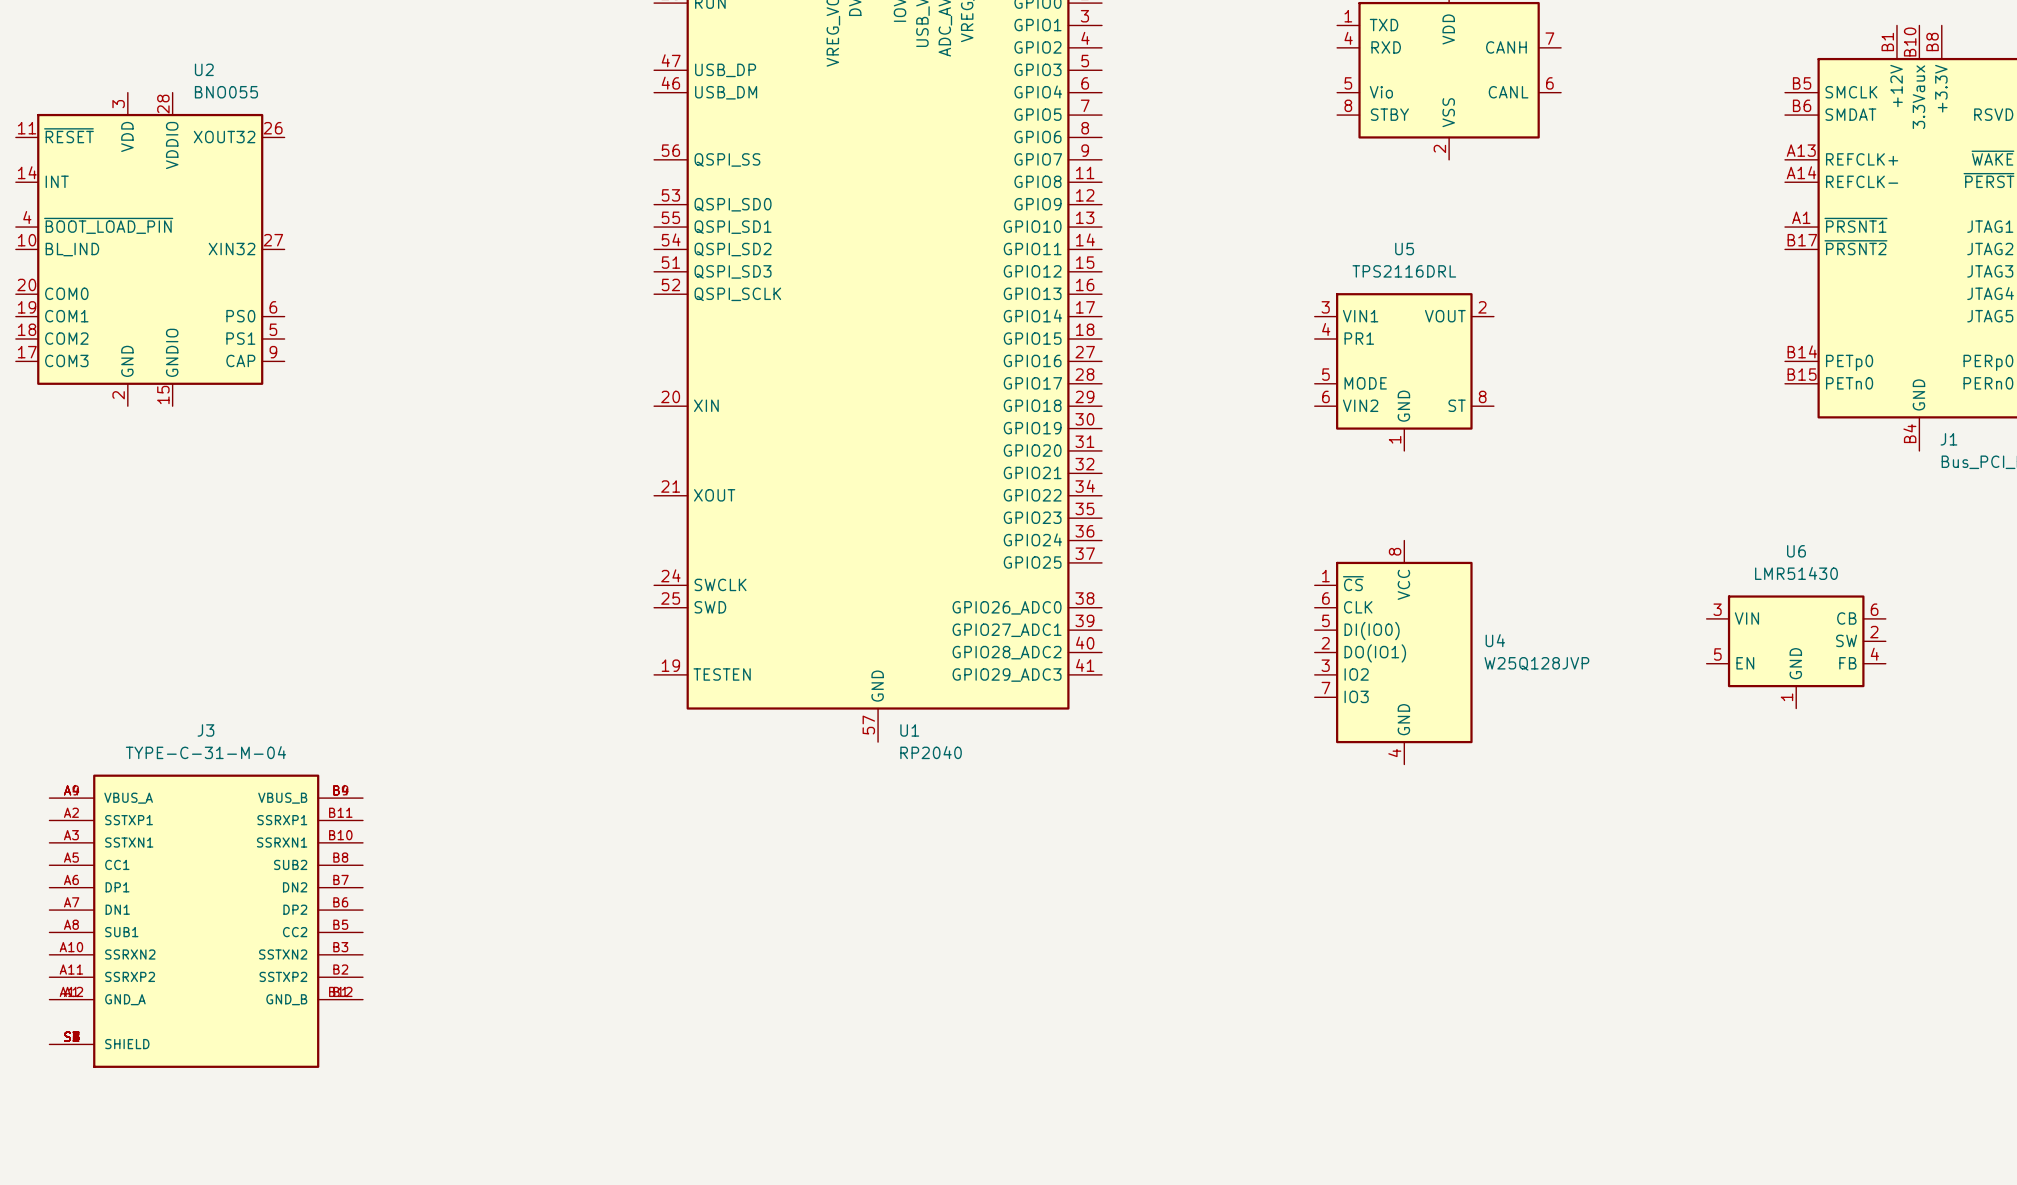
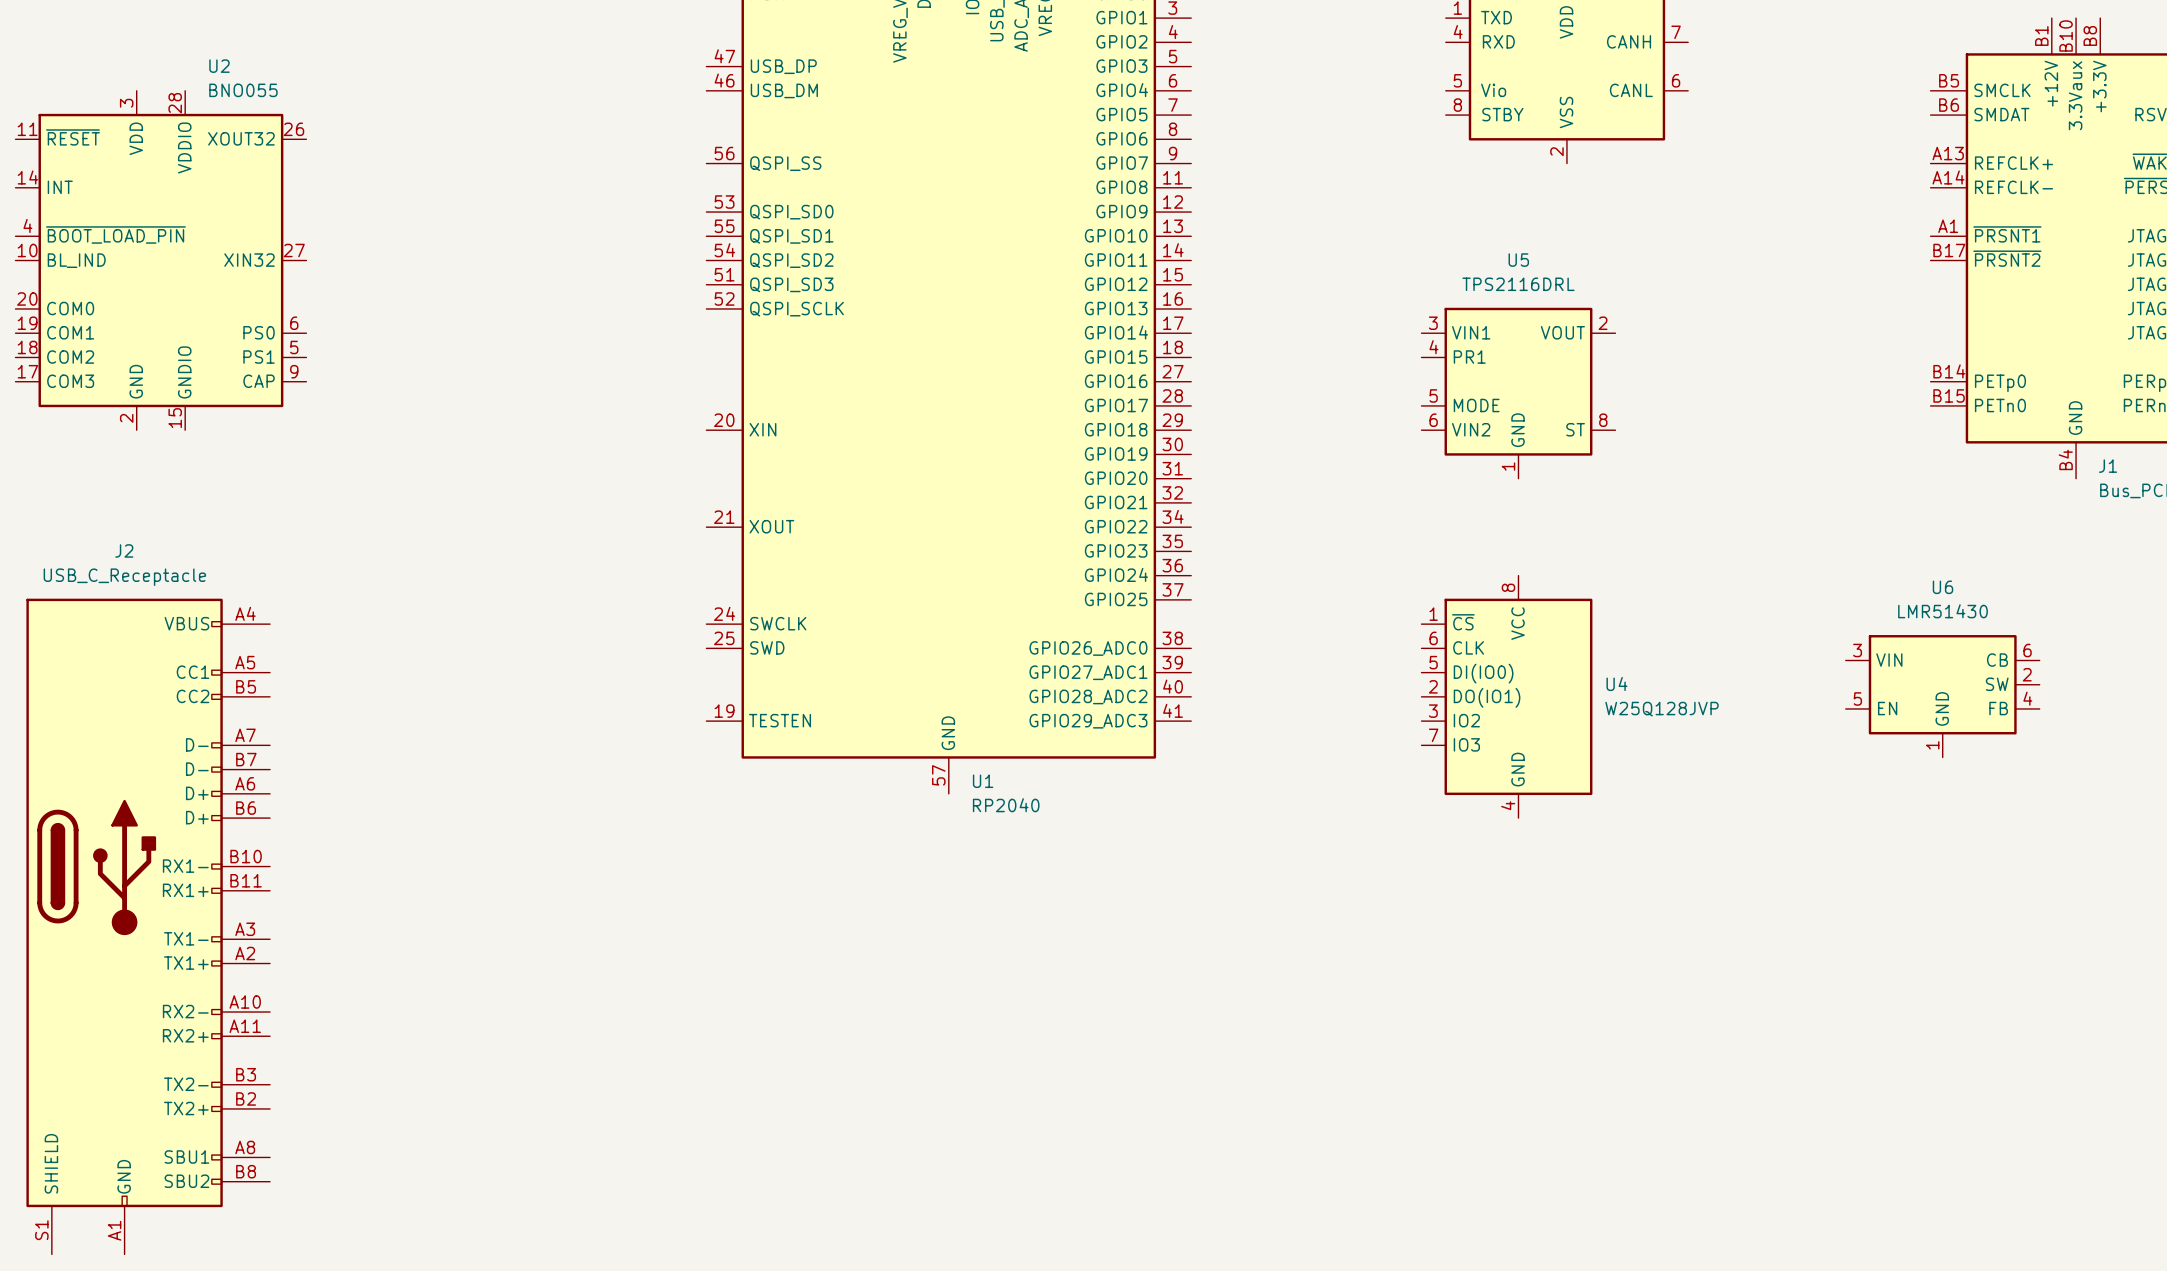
J2: none -> USB_C_Receptacle (148, 926)
J3: TYPE-C-31-M-04 (206, 921) -> none

